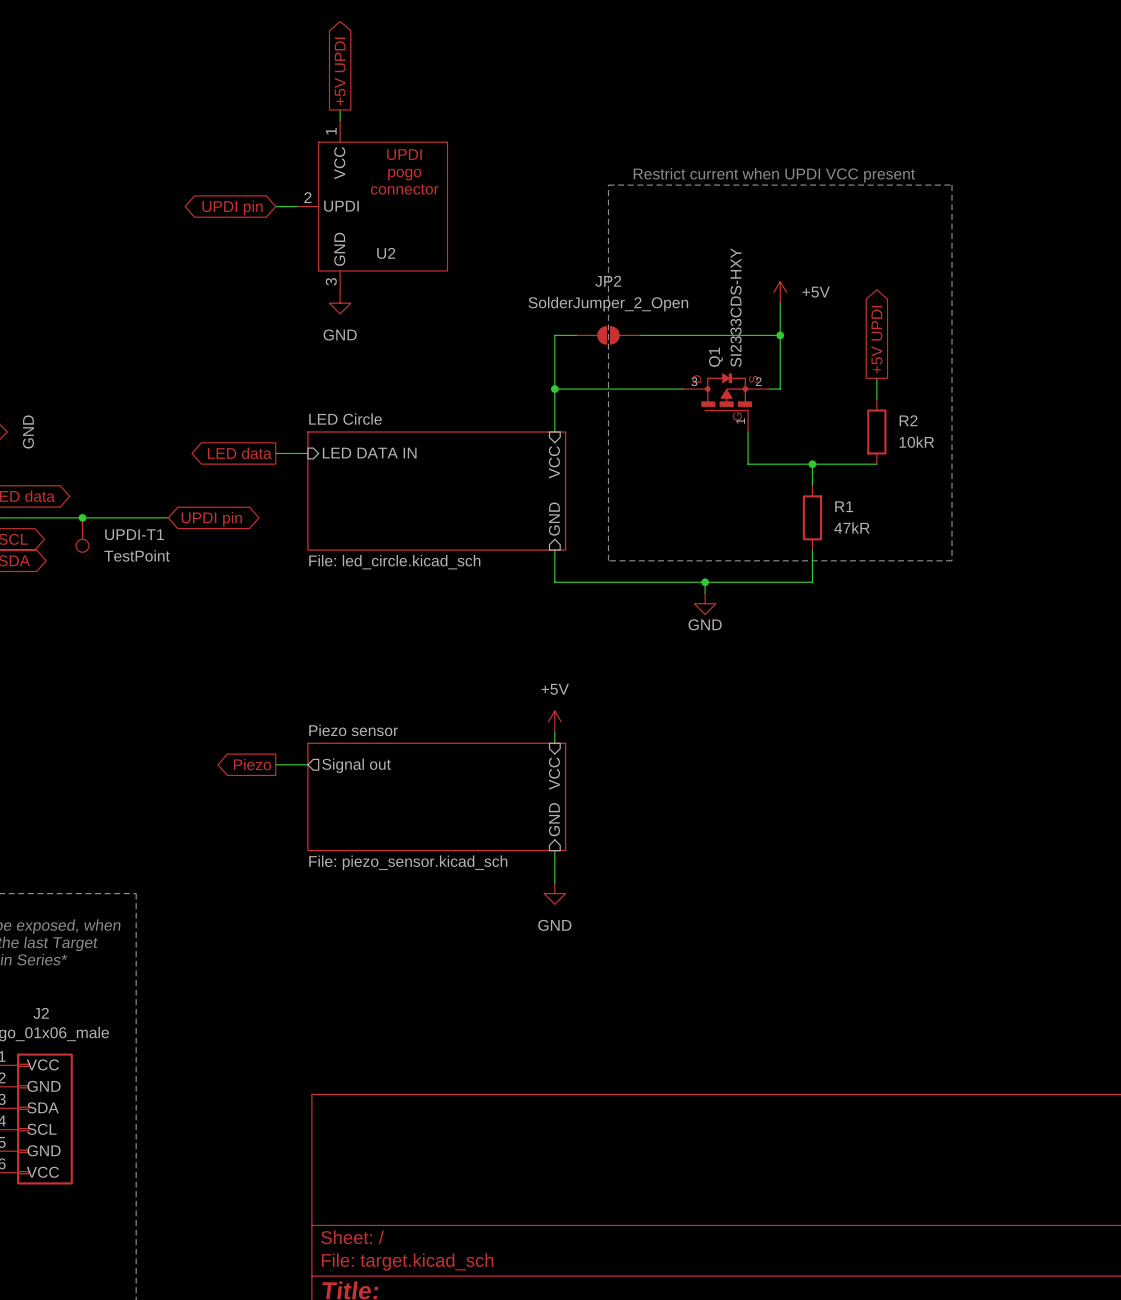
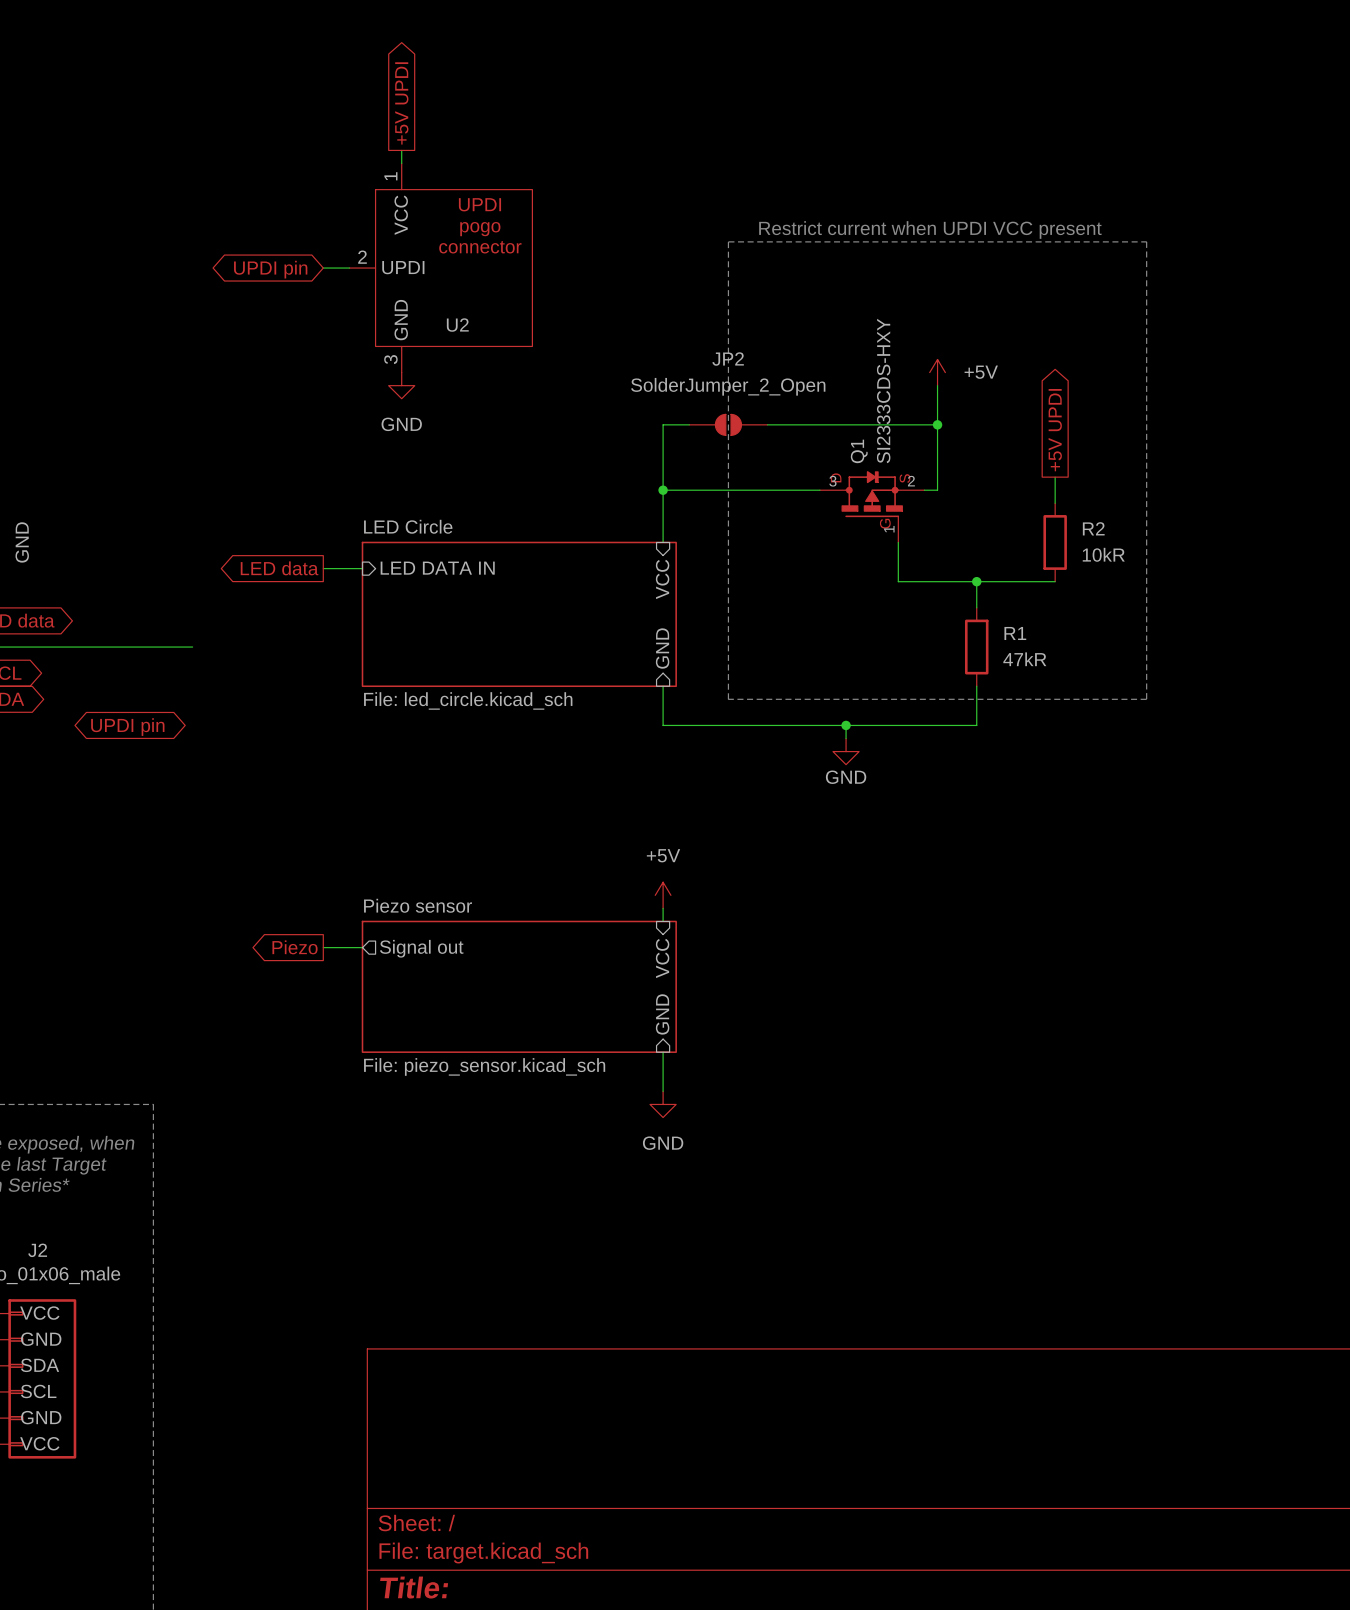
junction: (82, 517) -> none
global label position: UPDI pin (211, 519) -> UPDI pin (127, 727)
UPDI-T1: TestPoint (82, 535) -> none

